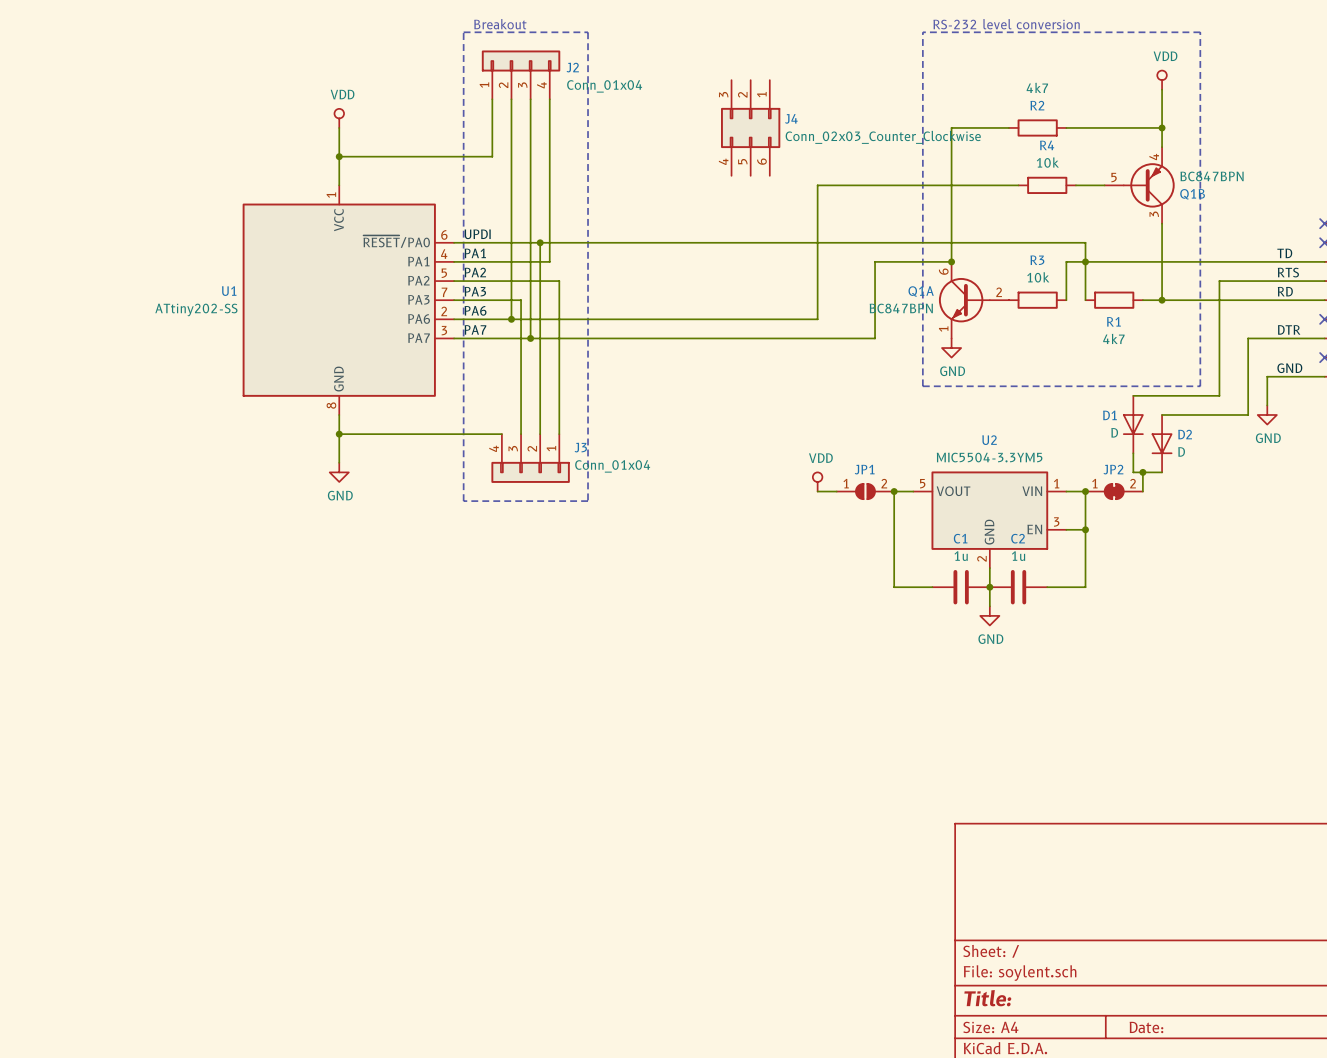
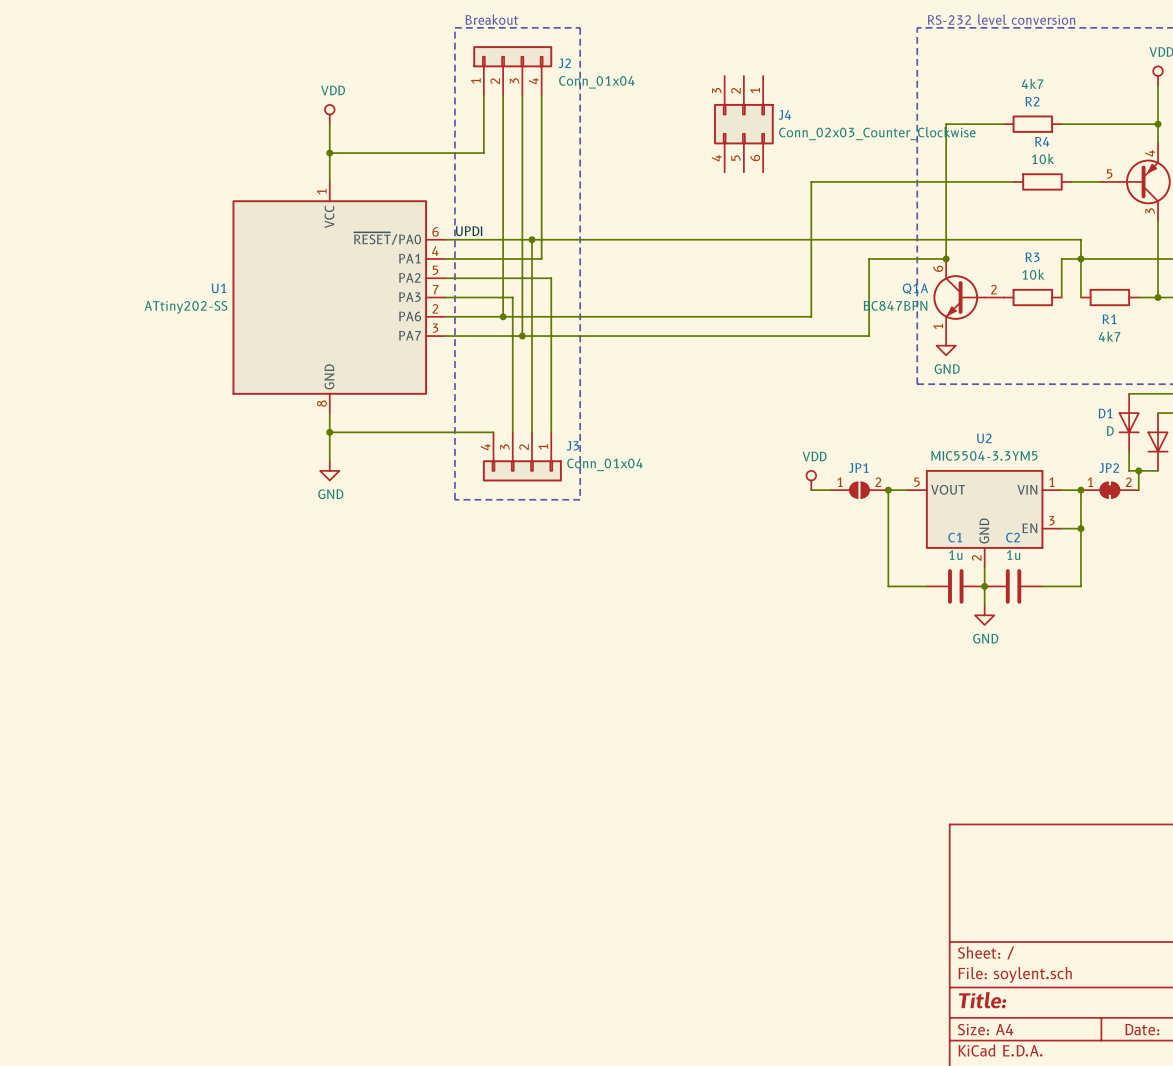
label: PA1 (475, 253) -> none
label: PA2 (475, 272) -> none
label: PA3 (475, 291) -> none
label: PA6 (475, 310) -> none
label: PA7 (475, 329) -> none

